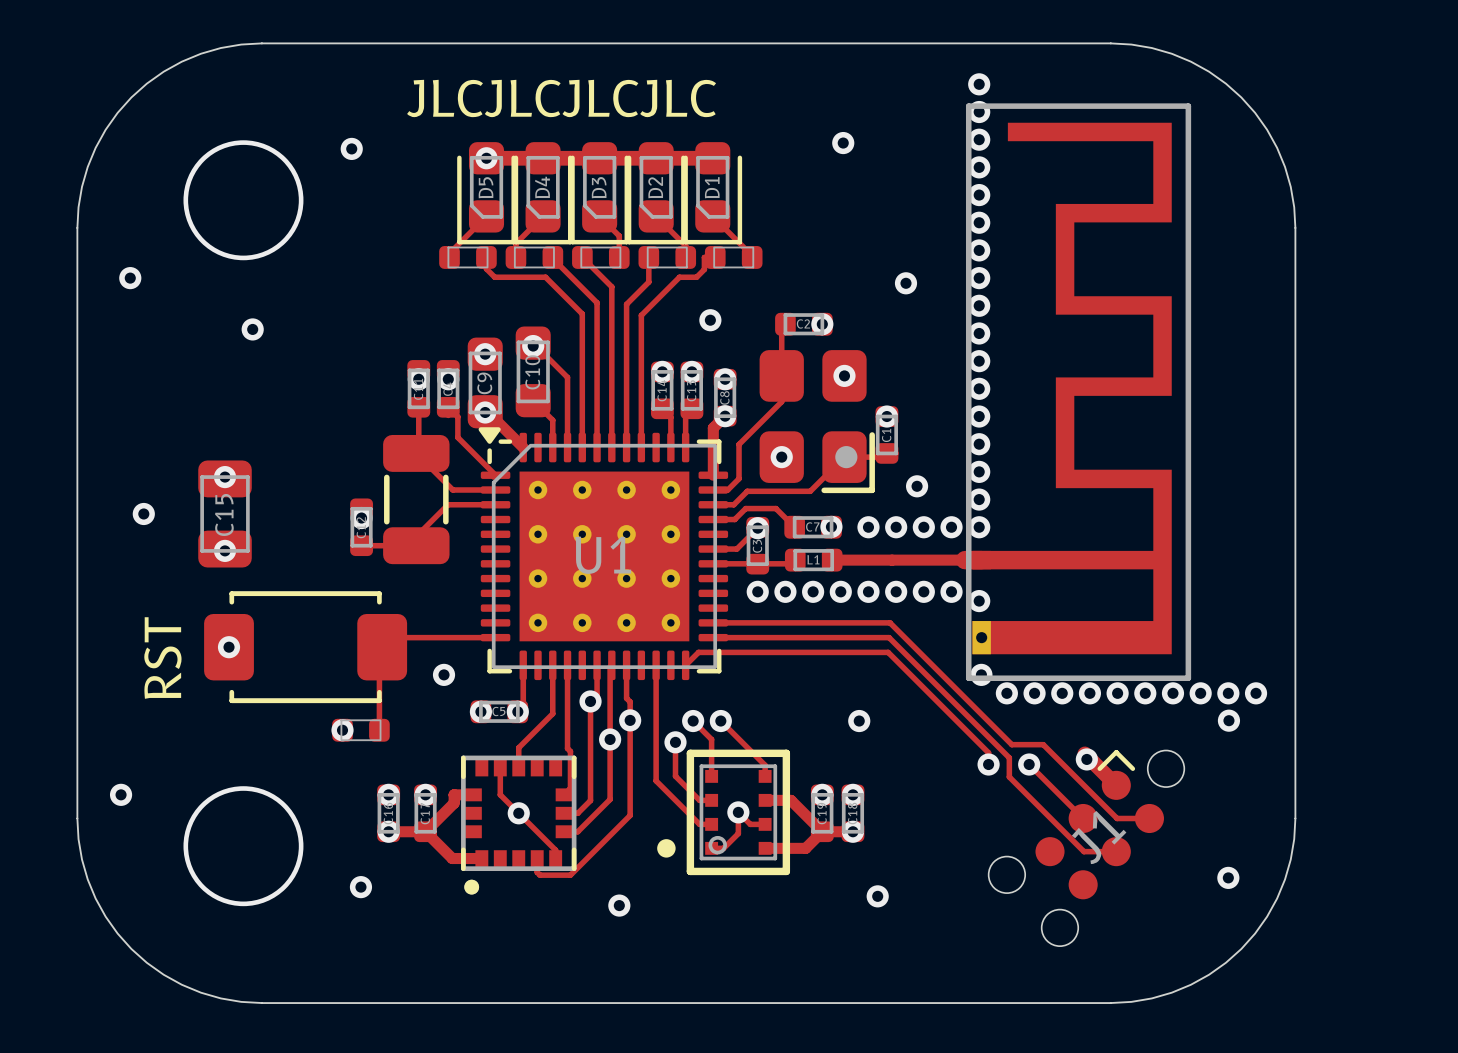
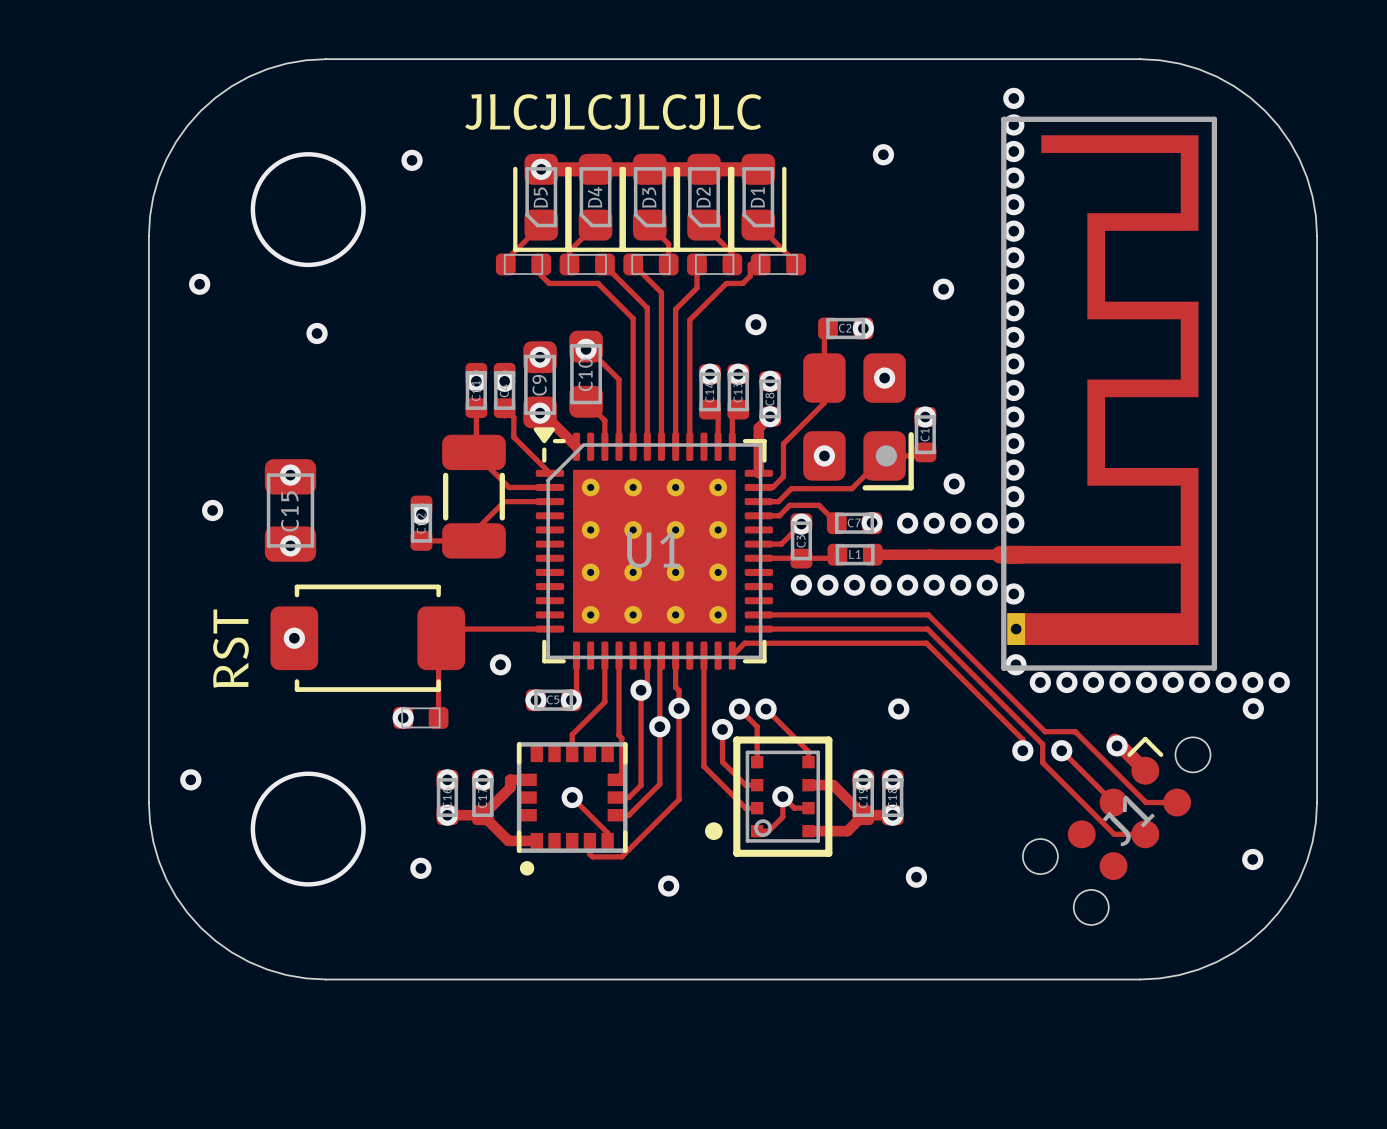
track: (500, 768) (500, 794) (518, 813) -> none

